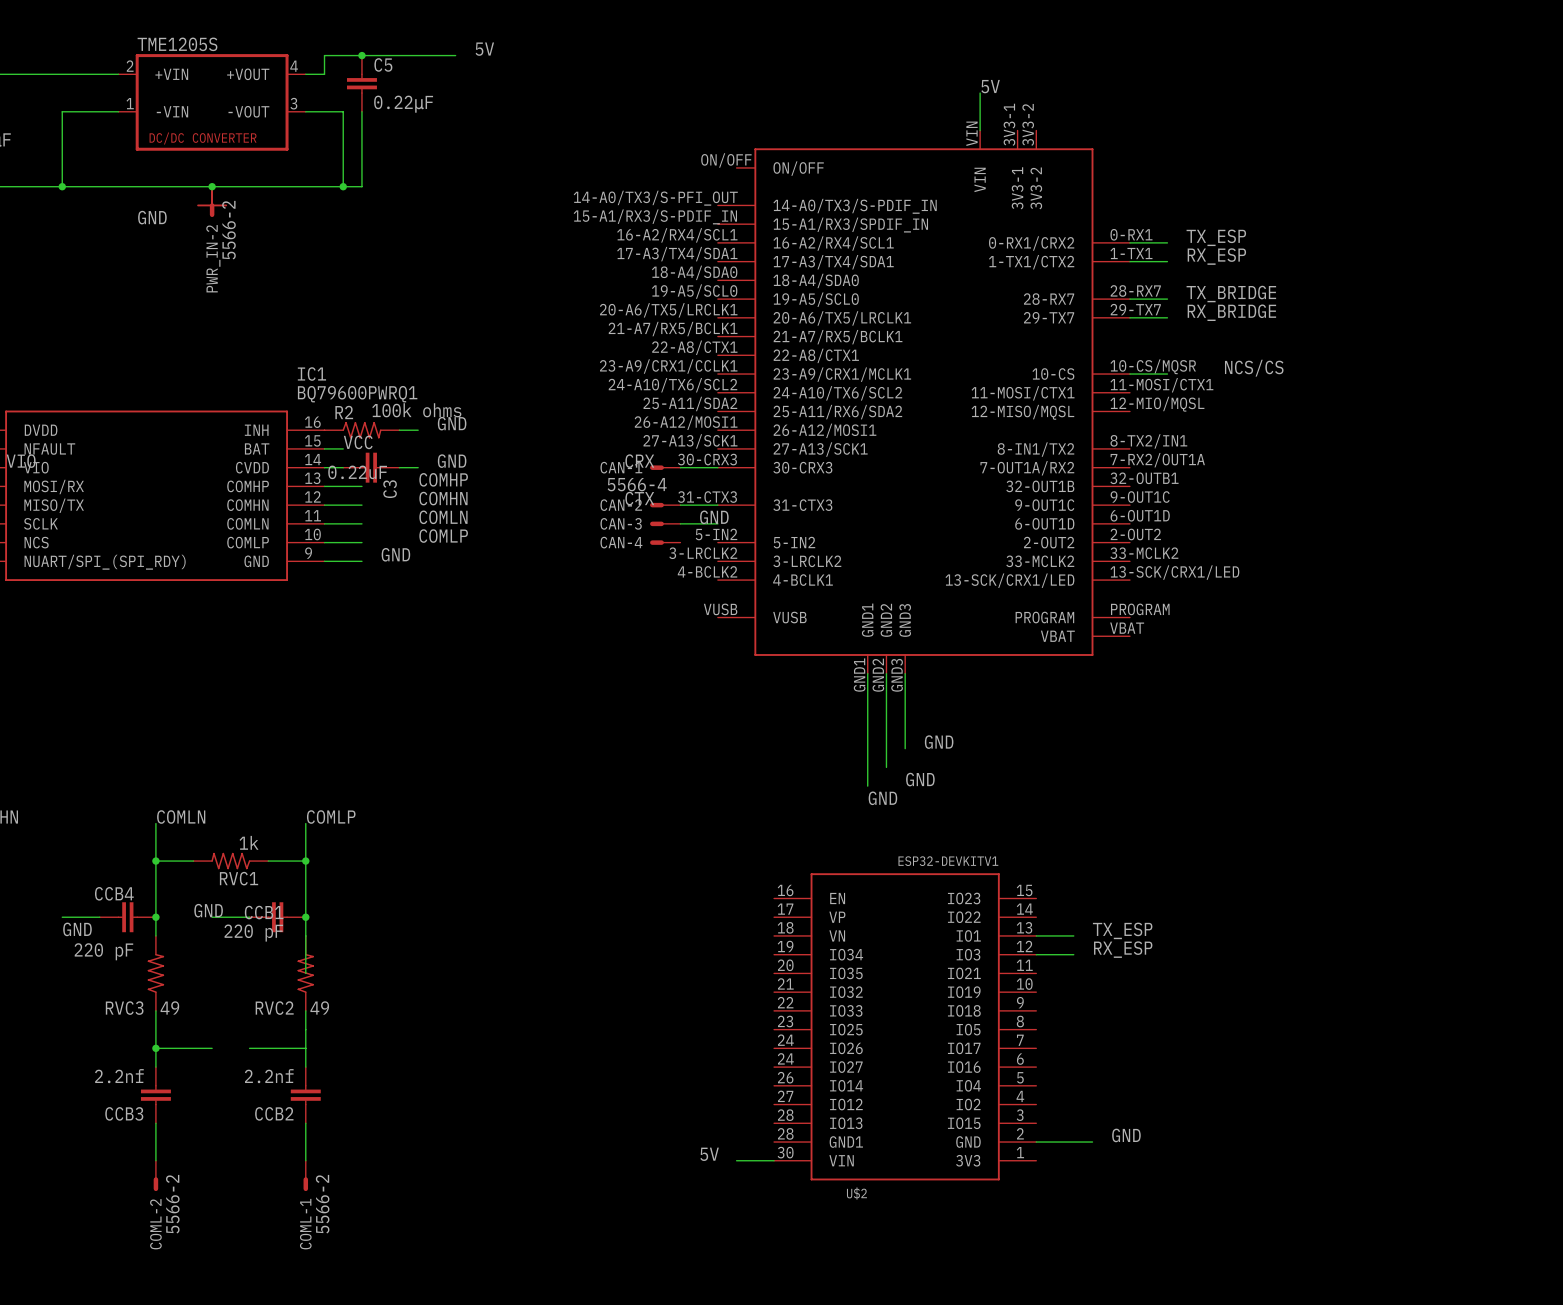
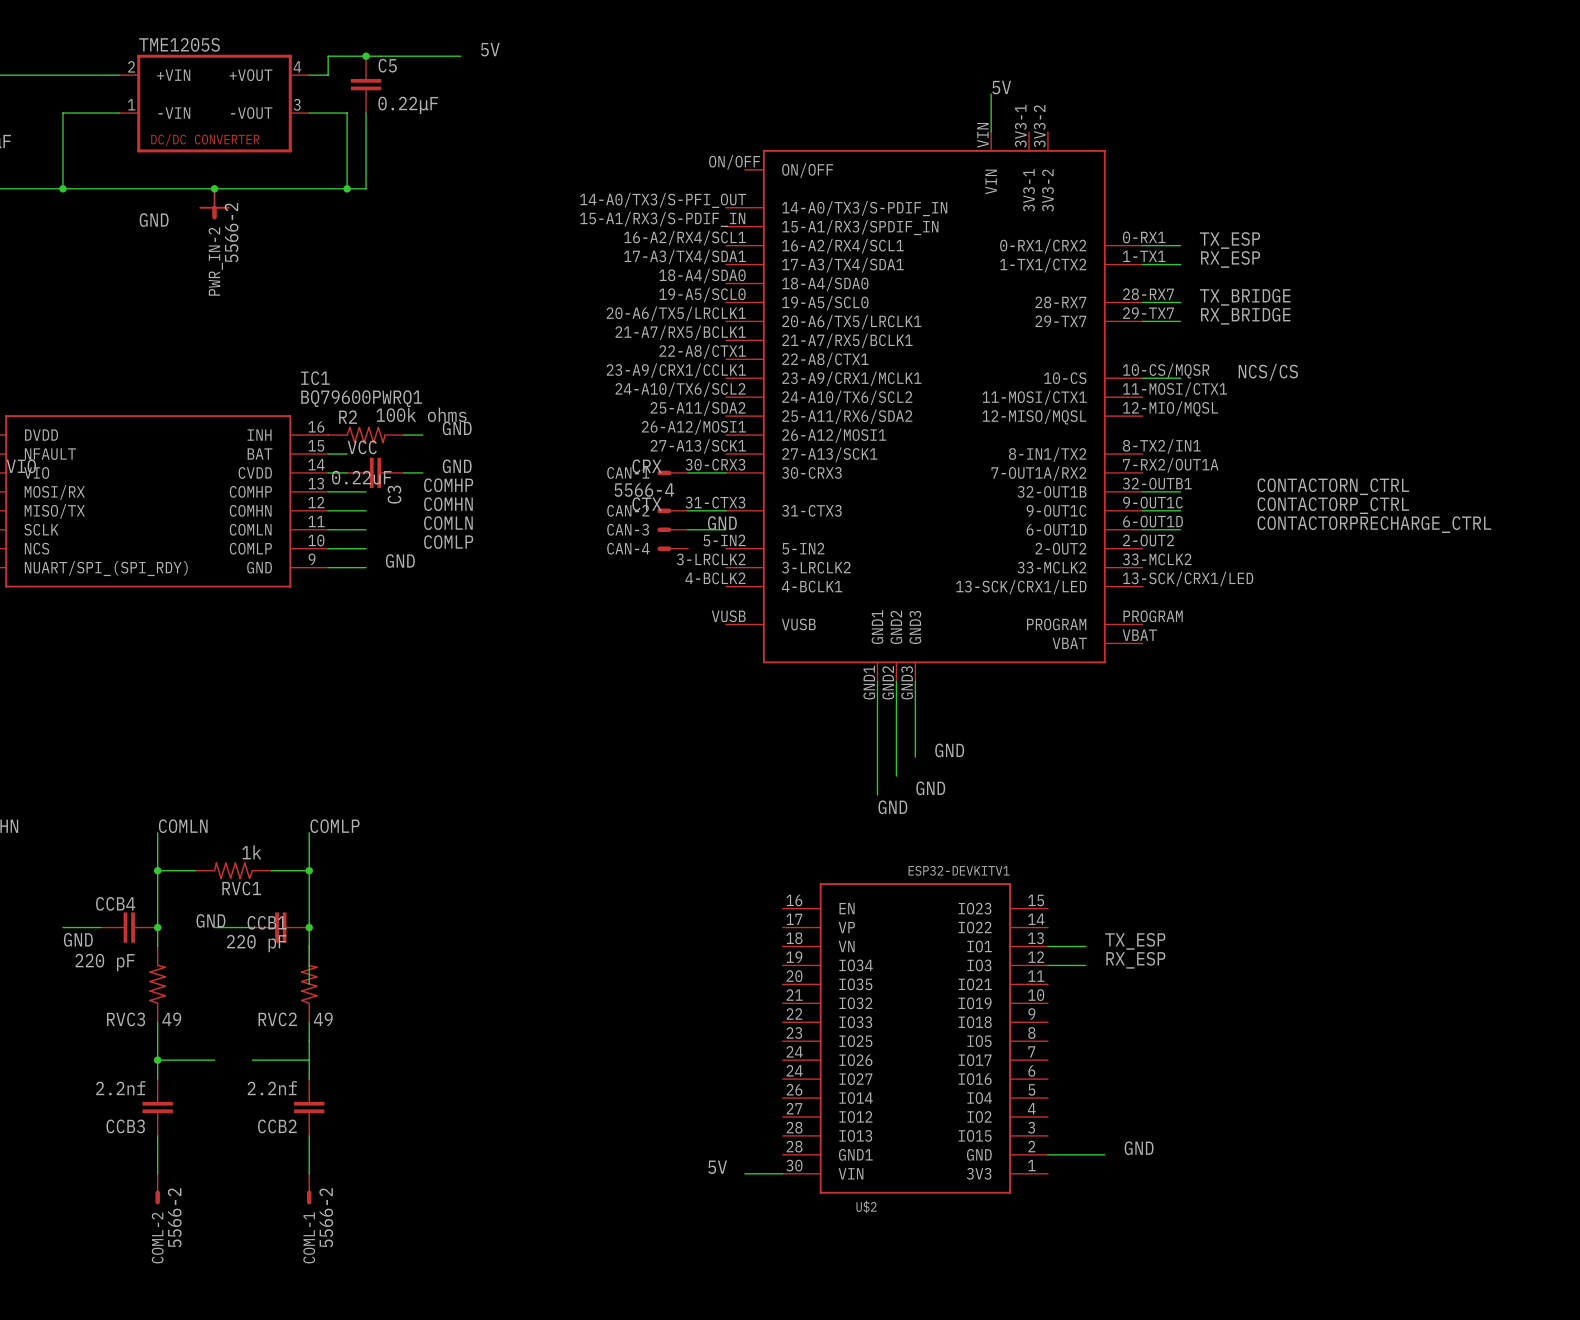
label: none -> CONTACTORN_CTRL (1333, 486)
wire: none -> (1142, 491) (1180, 491)
label: none -> CONTACTORP_CTRL (1333, 505)
wire: none -> (1142, 510) (1180, 510)
label: none -> CONTACTORPRECHARGE_CTRL (1374, 524)
wire: none -> (1142, 529) (1180, 529)

